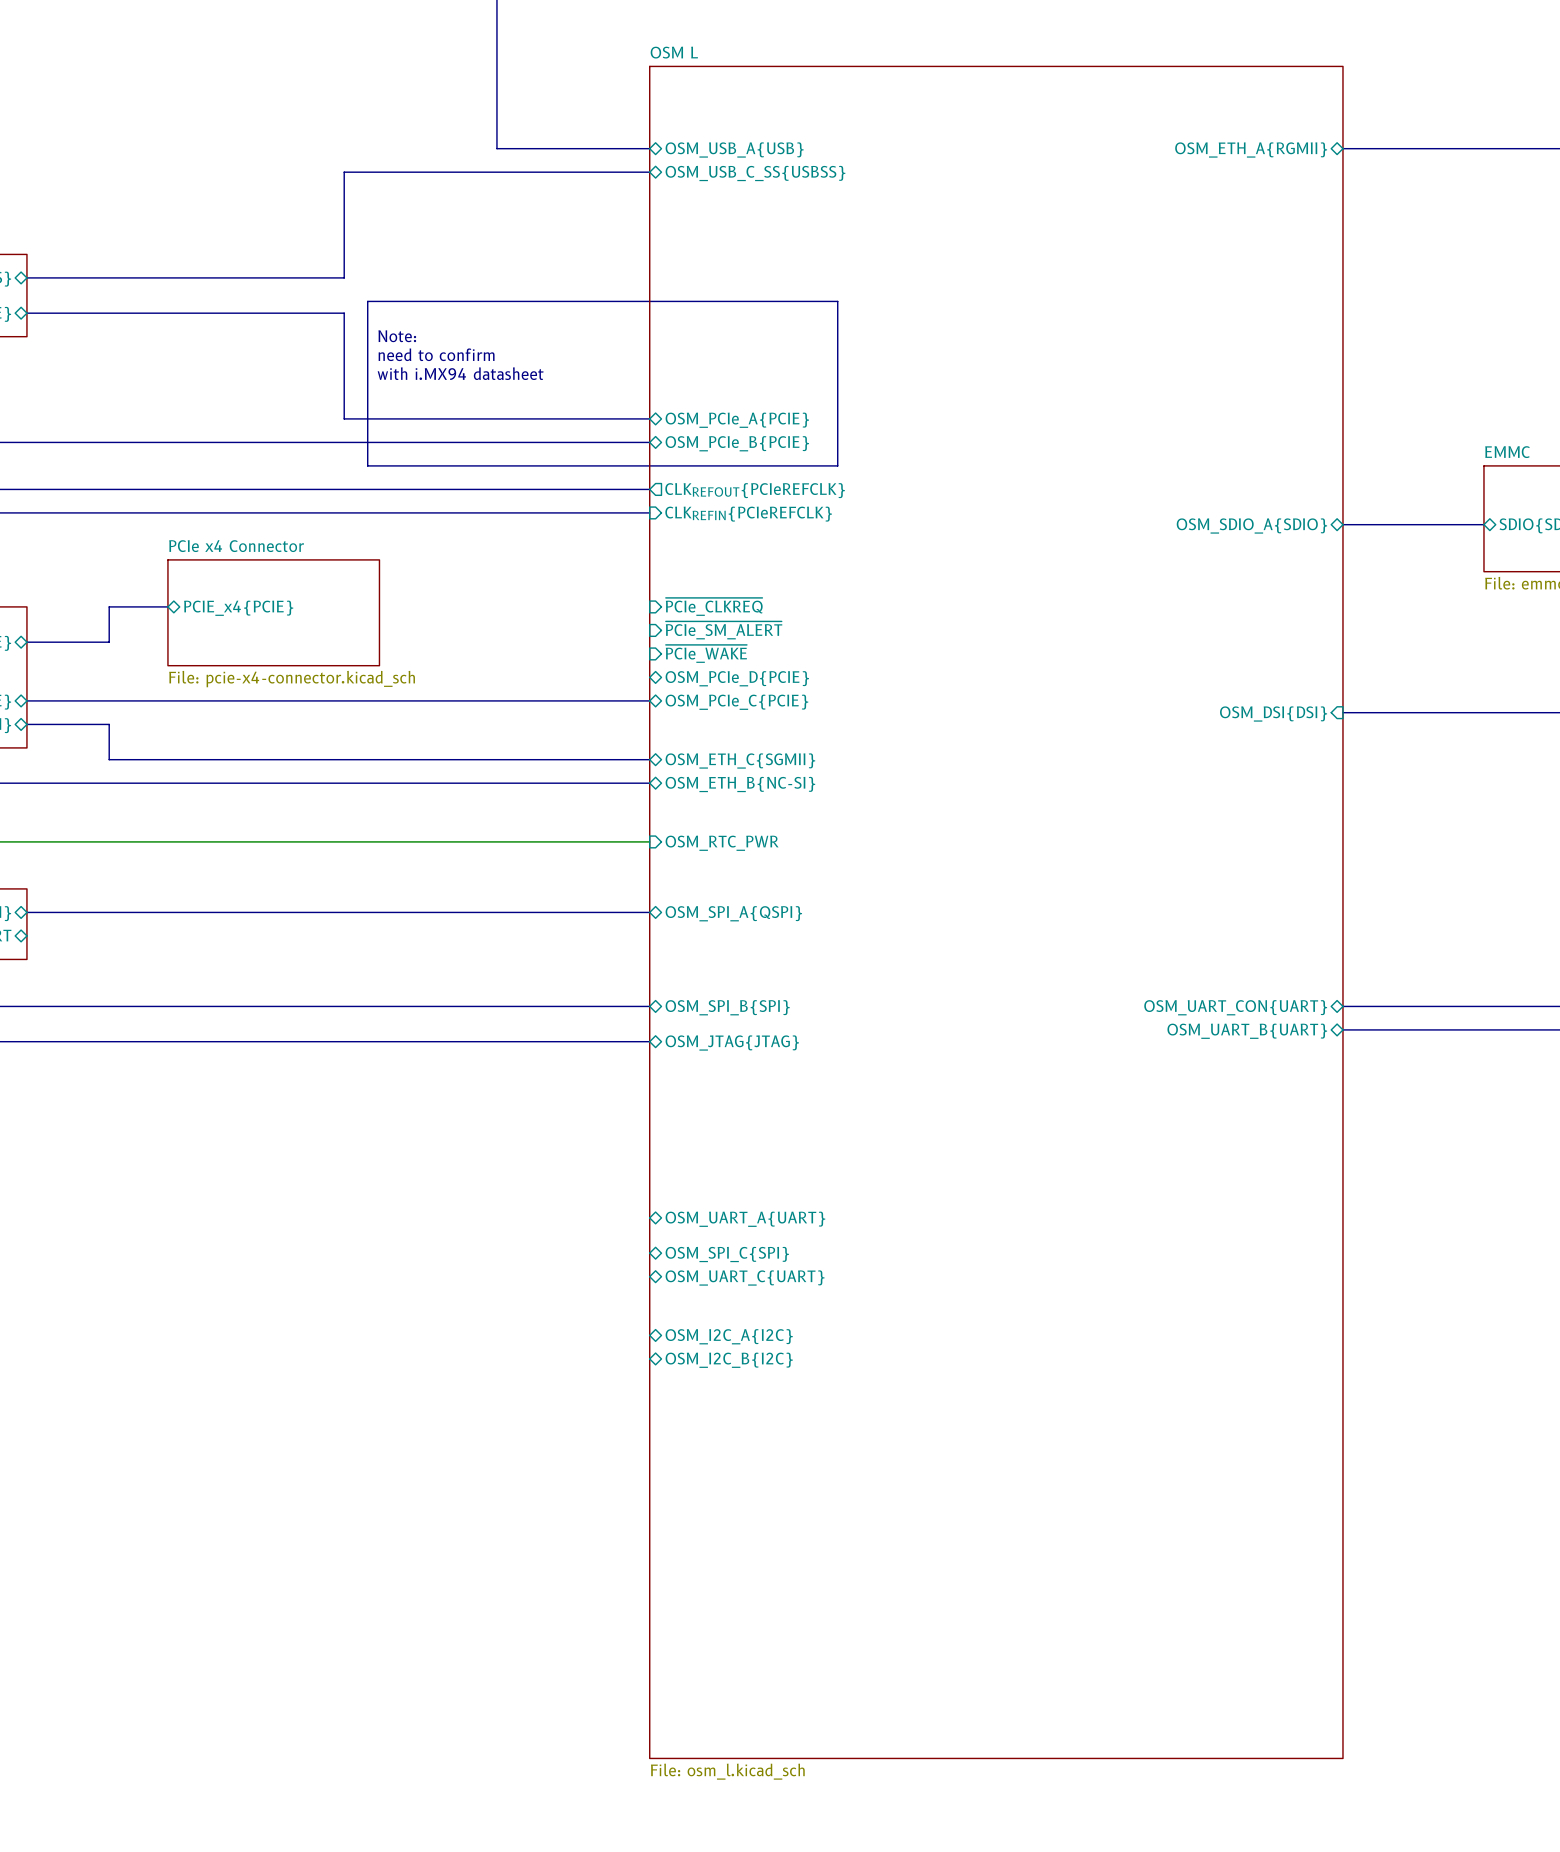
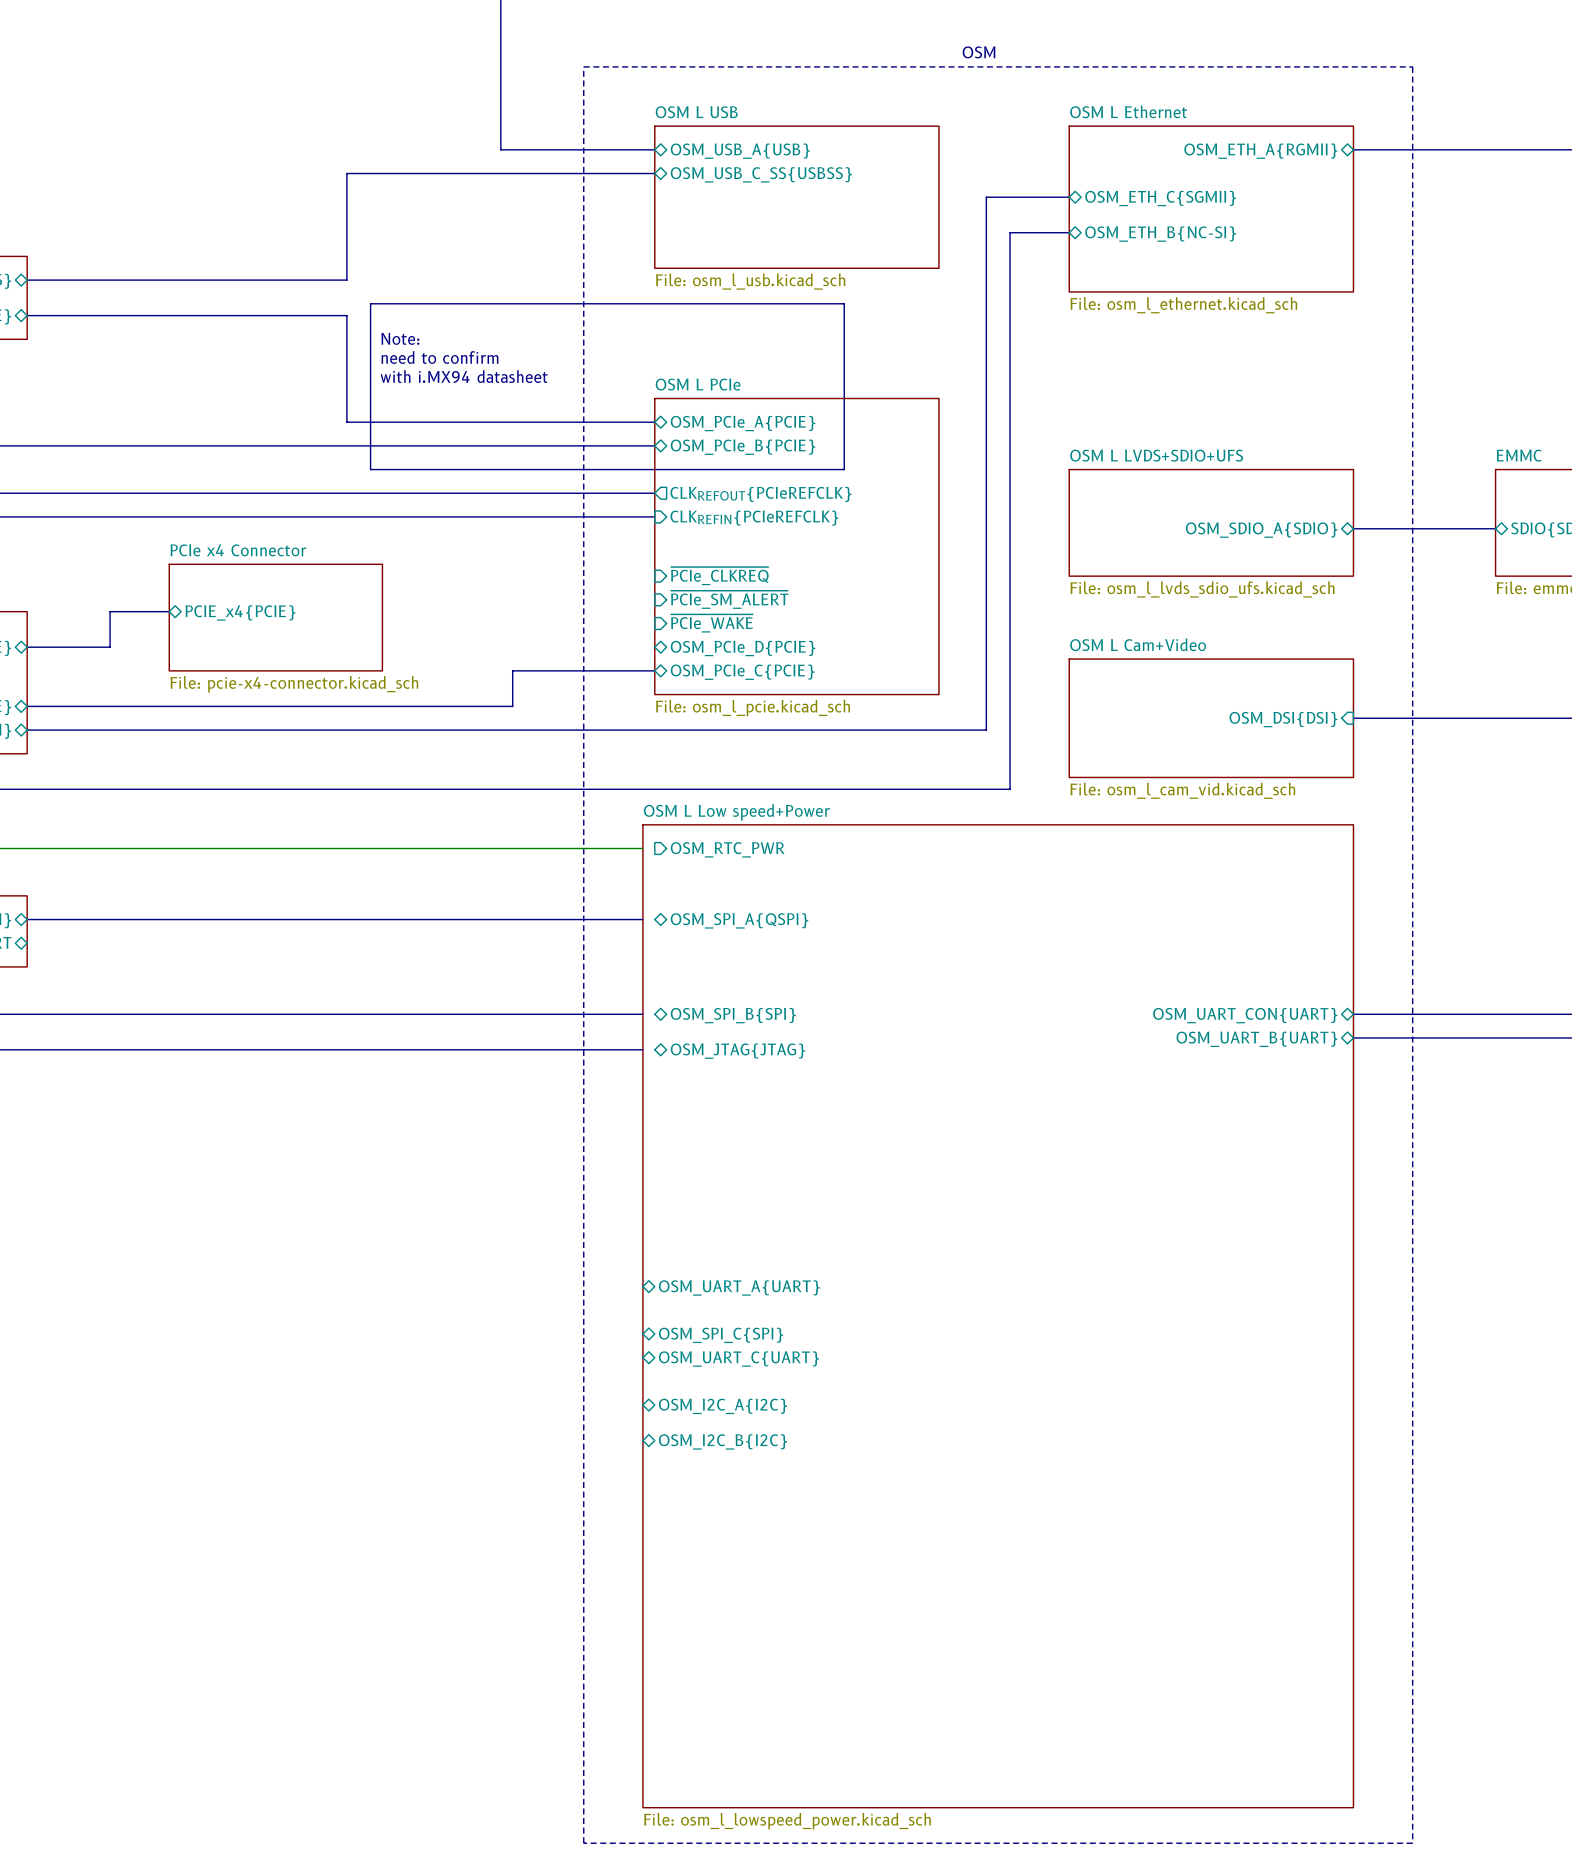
text: none -> OSM (979, 52)
line: none -> (583, 66) (1412, 66) (1412, 1843) (583, 1843) (583, 66)
sheet OSM L USB: none -> File: osm_l_usb.kicad_sch (796, 197)
sheet pin: none -> OSM_ETH_C{SGMII} (1160, 198)
sheet OSM L Ethernet: none -> File: osm_l_ethernet.kicad_sch (1211, 209)
bus: none -> (1069, 232) (1010, 232) (1010, 789) (654, 789)
sheet pin: none -> OSM_ETH_B{NC-SI} (1160, 234)
sheet OSM L LVDS+SDIO+UFS: none -> File: osm_l_lvds_sdio_ufs.kicad_sch (1211, 522)
sheet OSM L PCIe: none -> File: osm_l_pcie.kicad_sch (796, 546)
sheet pin position: ~{PCIe_CLKREQ} (714, 606) -> ~{PCIe_CLKREQ} (719, 576)
sheet pin position: ~{PCIe_SM_ALERT} (724, 630) -> ~{PCIe_SM_ALERT} (729, 599)
sheet pin position: ~{PCIe_WAKE} (706, 653) -> ~{PCIe_WAKE} (711, 623)
sheet pin position: OSM_PCIe_D{PCIE} (737, 678) -> OSM_PCIe_D{PCIE} (743, 648)
bus: (508, 700) (649, 700) -> (512, 706) (512, 670) (654, 670)
sheet pin position: OSM_PCIe_C{PCIE} (736, 702) -> OSM_PCIe_C{PCIE} (742, 672)
sheet OSM L Cam+Video: none -> File: osm_l_cam_vid.kicad_sch (1211, 718)
bus: (109, 724) (109, 759) (649, 759) -> (110, 730) (986, 730) (986, 197) (1069, 197)
sheet pin: OSM_ETH_C{SGMII} (740, 761) -> none
sheet pin: OSM_ETH_B{NC-SI} (740, 784) -> none
wire: (637, 841) (649, 841) -> none
bus: (637, 912) (649, 912) -> none
sheet OSM L: File: osm_l.kicad_sch (996, 912) -> none
bus: (637, 1006) (649, 1006) -> none
bus: (637, 1041) (649, 1041) -> none
sheet pin position: OSM_UART_A{UART} (745, 1219) -> OSM_UART_A{UART} (739, 1287)
sheet pin position: OSM_SPI_C{SPI} (727, 1254) -> OSM_SPI_C{SPI} (721, 1335)
sheet pin position: OSM_UART_C{UART} (745, 1278) -> OSM_UART_C{UART} (738, 1359)
sheet OSM L Low speed+Power: none -> File: osm_l_lowspeed_power.kicad_sch (998, 1316)
sheet pin position: OSM_I2C_A{I2C} (729, 1336) -> OSM_I2C_A{I2C} (723, 1406)
sheet pin position: OSM_I2C_B{I2C} (729, 1360) -> OSM_I2C_B{I2C} (723, 1441)

